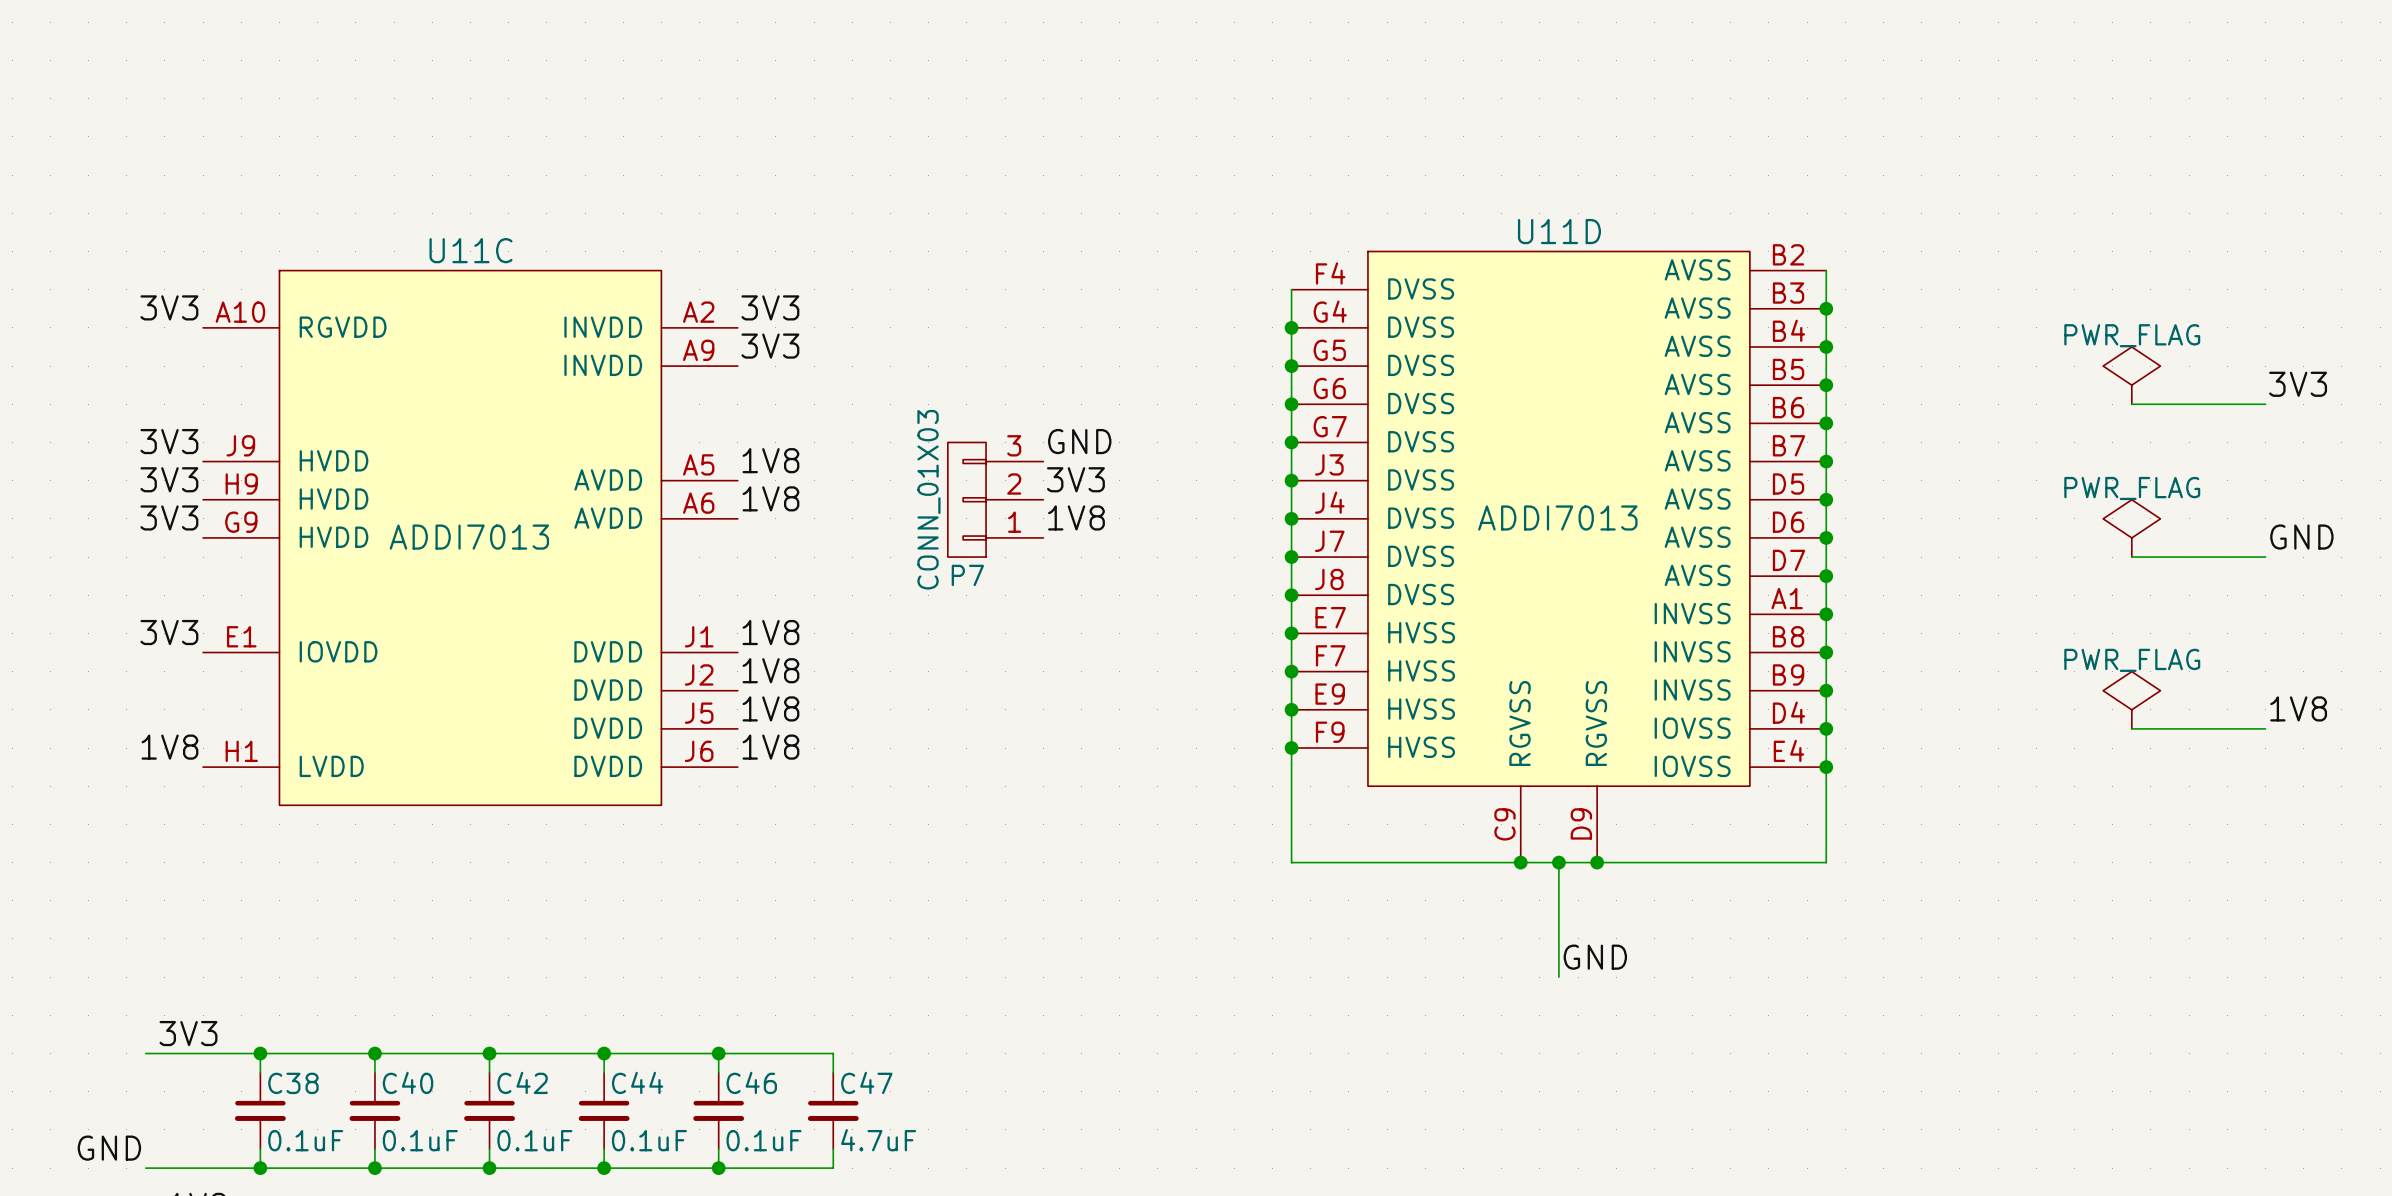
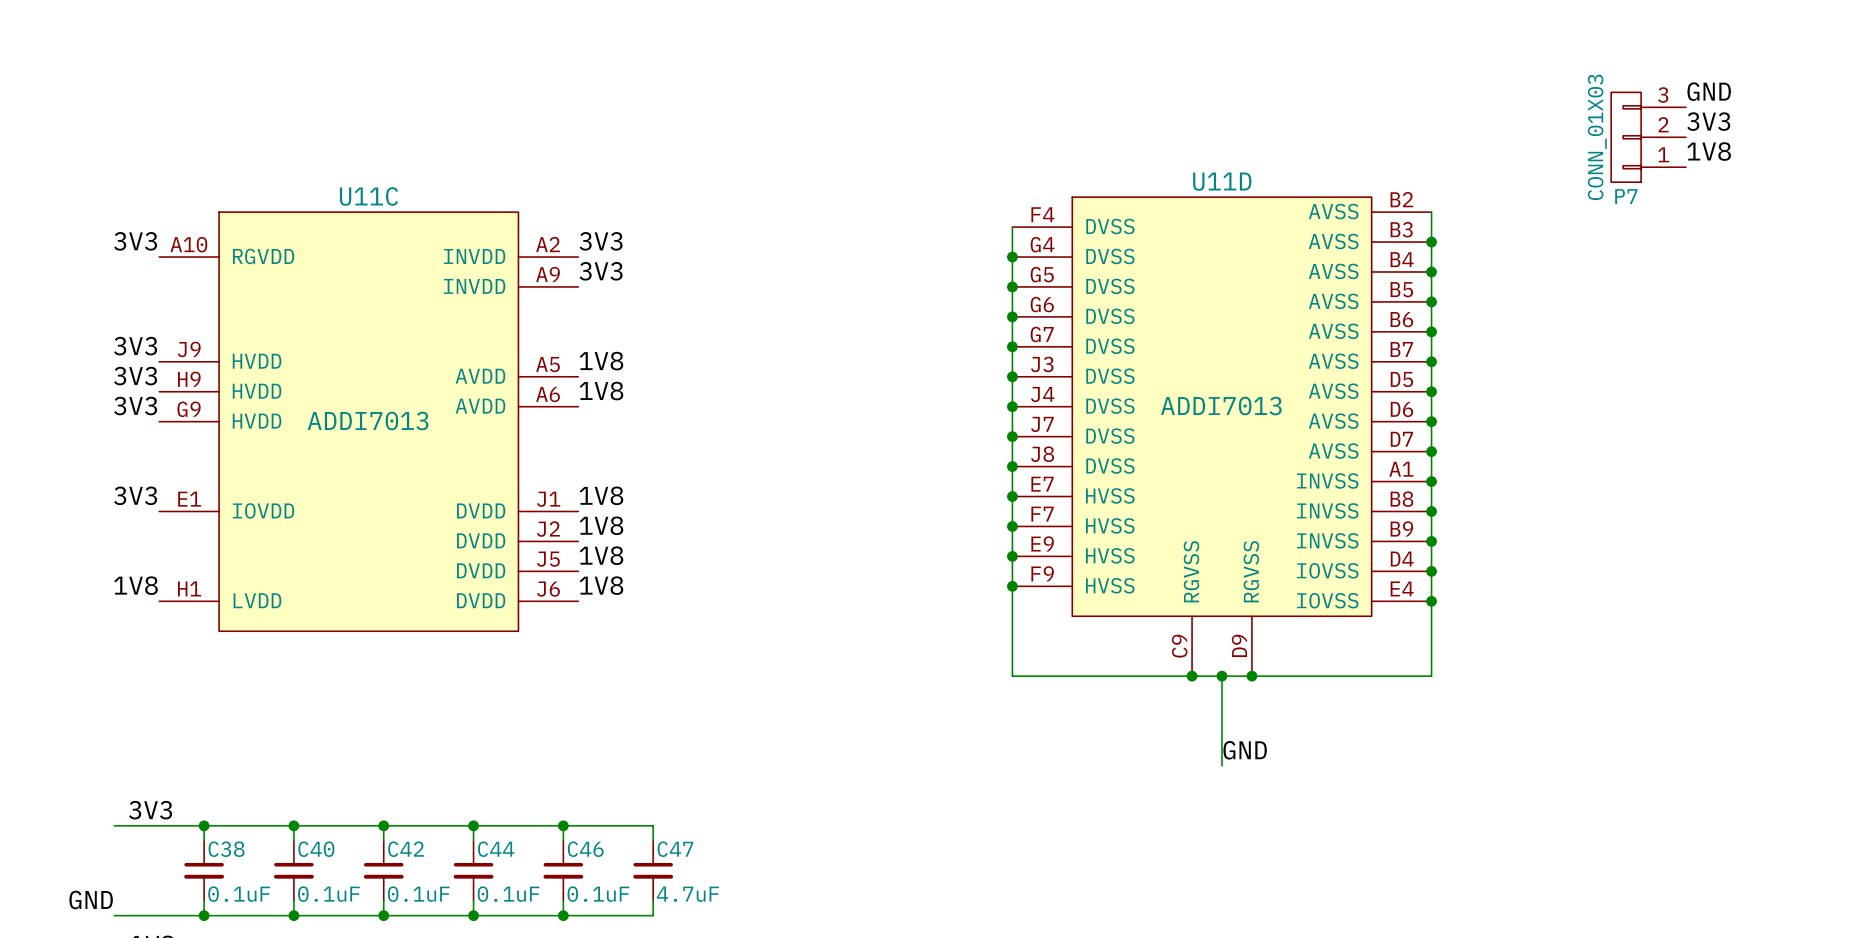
label: none -> GND (1709, 91)
label: none -> 1V8 (1709, 151)
power symbol: PWR_FLAG (2131, 375) -> none
label position: 3V3 (2298, 384) -> 3V3 (1708, 121)
wire: (2131, 404) (2265, 404) -> none
label: GND (1079, 441) -> none
label: 3V3 (1075, 479) -> none
P7 position: (995, 499) -> (1648, 137)
label: 1V8 (1076, 517) -> none
power symbol: PWR_FLAG (2131, 528) -> none
label: GND (2301, 537) -> none
wire: (2131, 557) (2265, 557) -> none
power symbol: PWR_FLAG (2131, 700) -> none
label: 1V8 (2298, 708) -> none
wire: (2131, 728) (2265, 728) -> none

